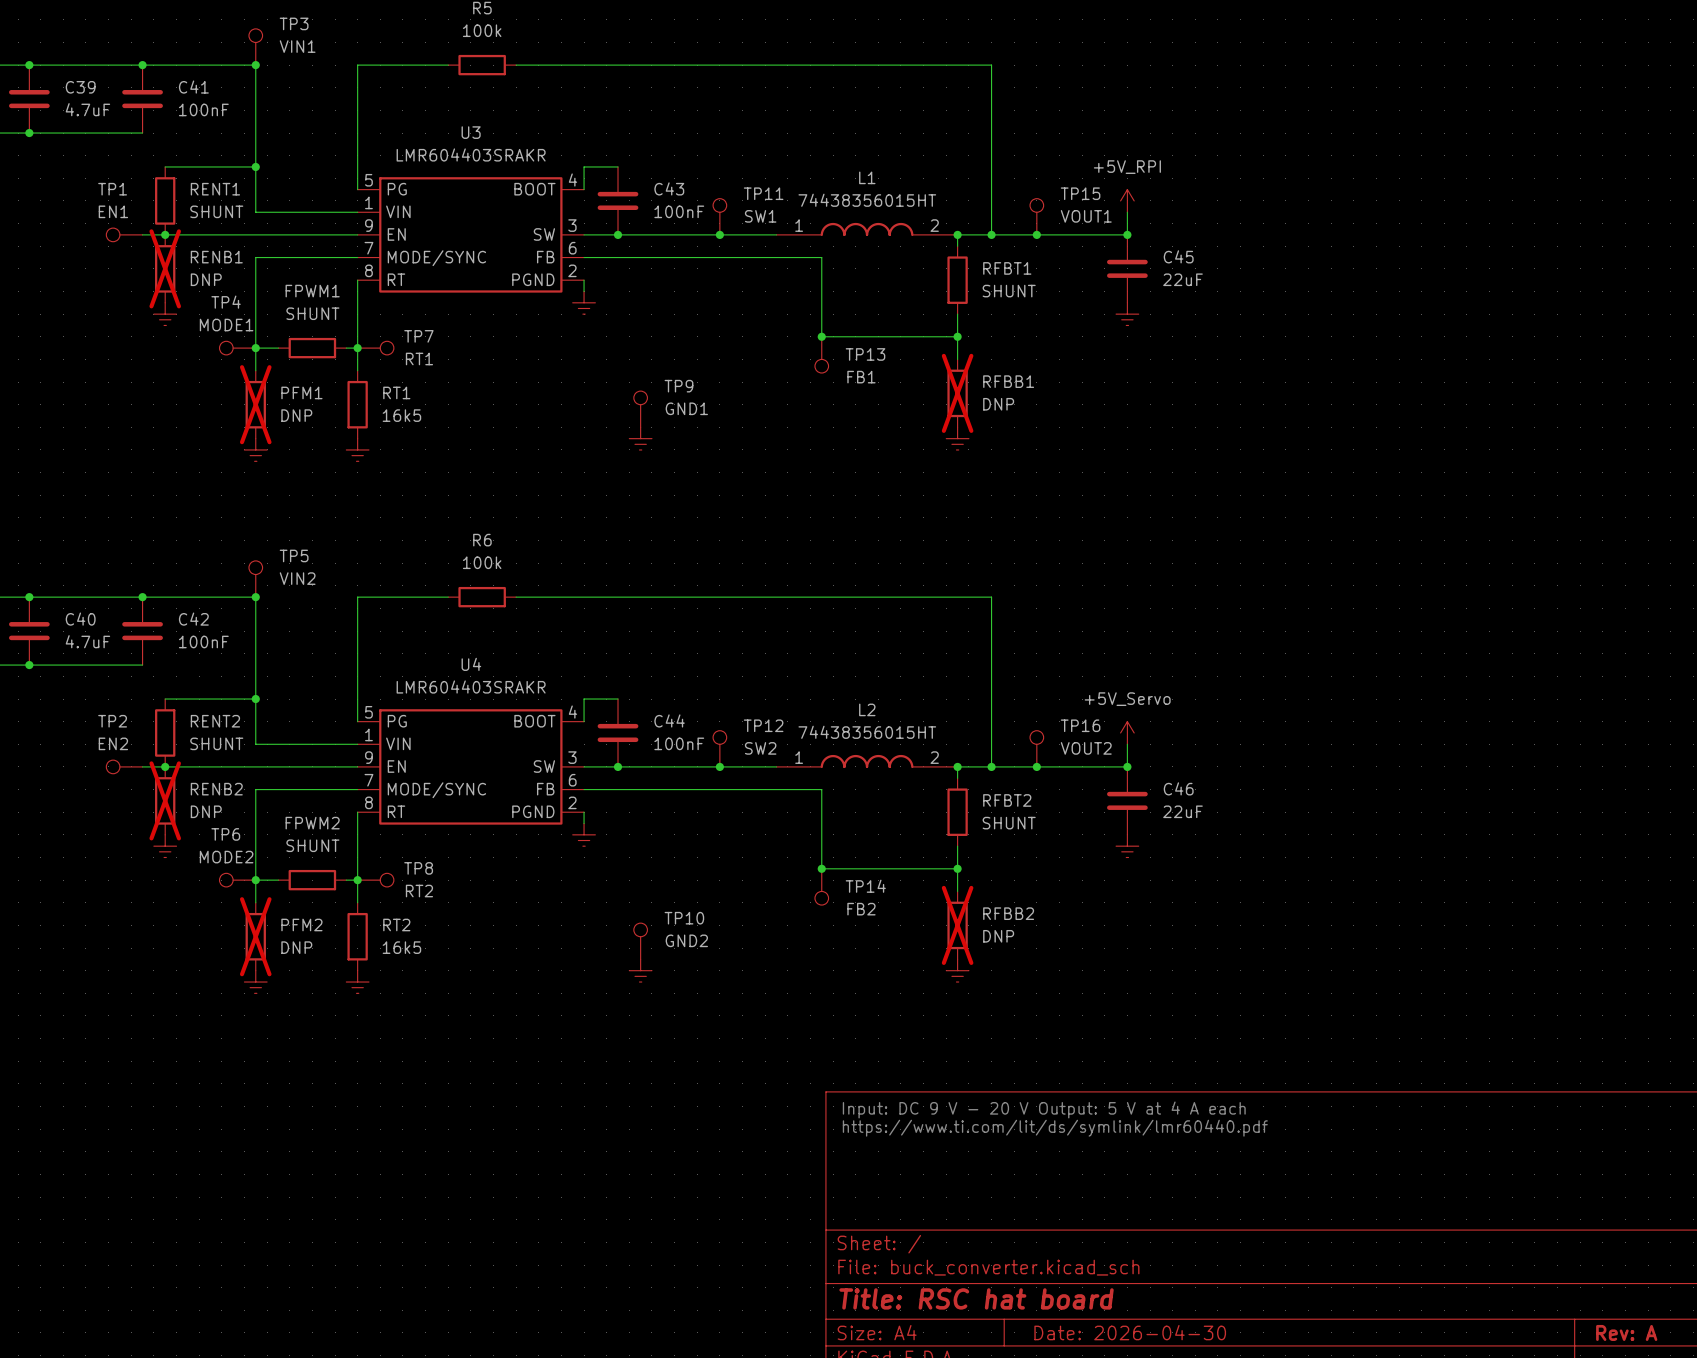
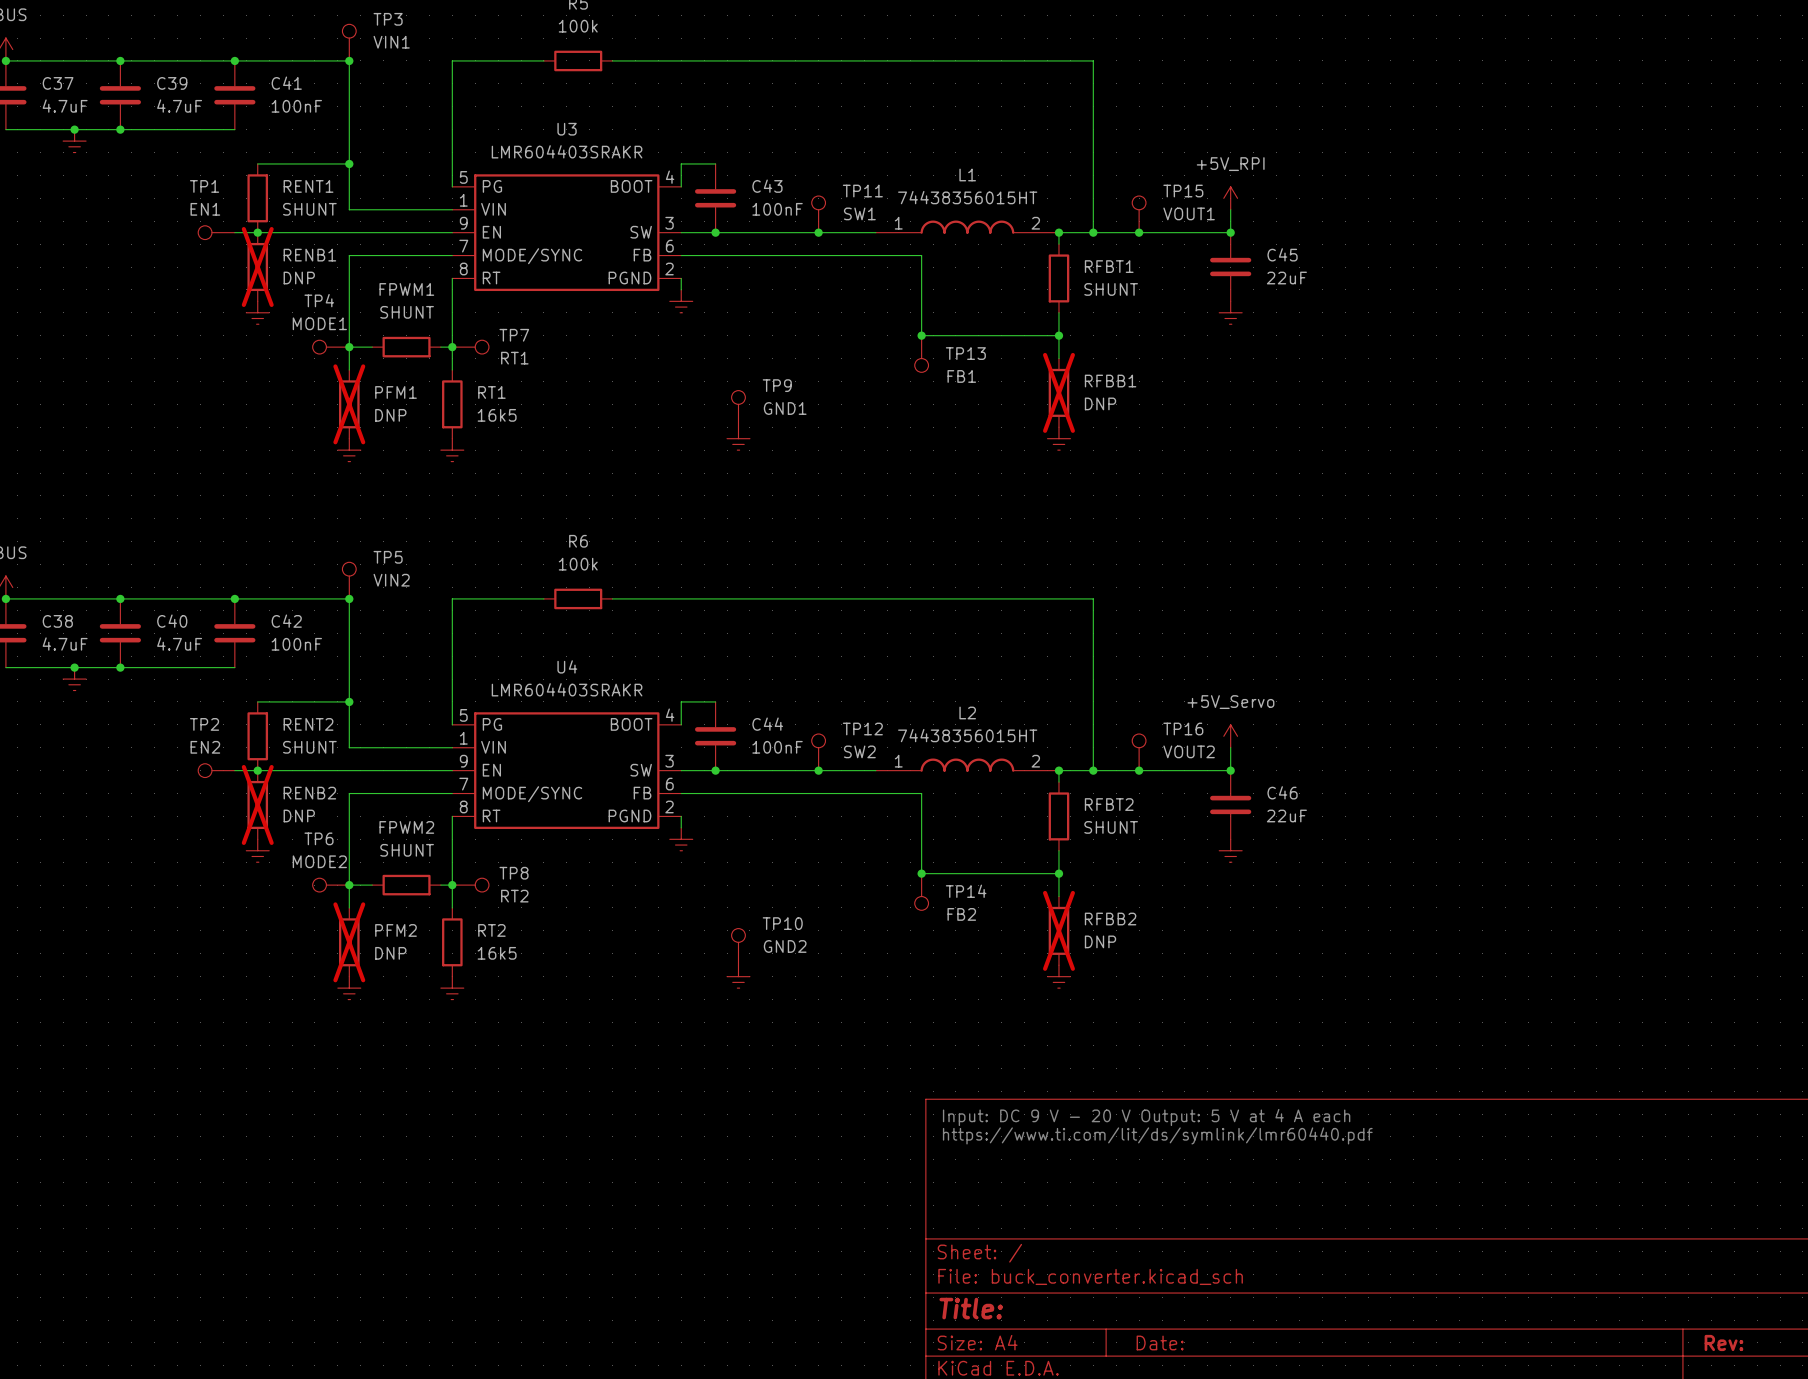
title block: Title: RSC hat board (976, 1298) -> Title: (971, 1308)
title block: Date: 2026-04-30 (1130, 1332) -> Date: (1160, 1342)
title block: Rev: A (1626, 1332) -> Rev: (1723, 1342)

